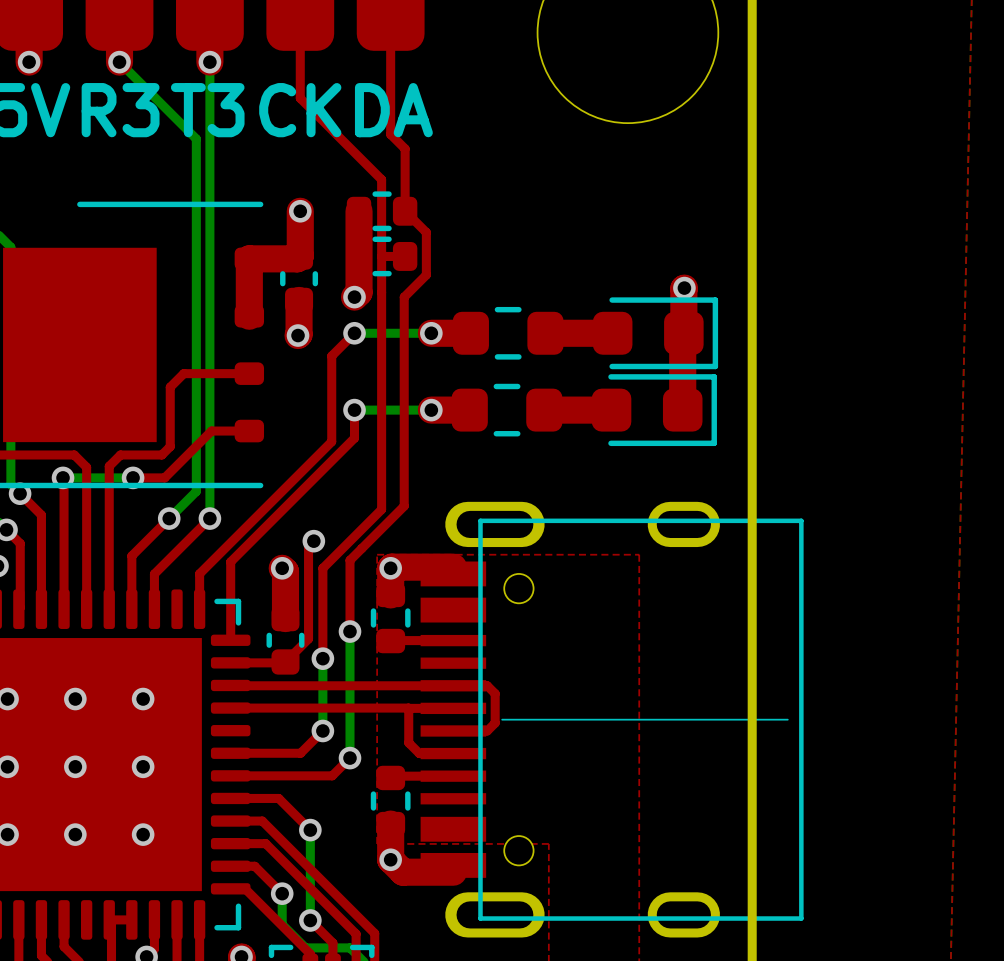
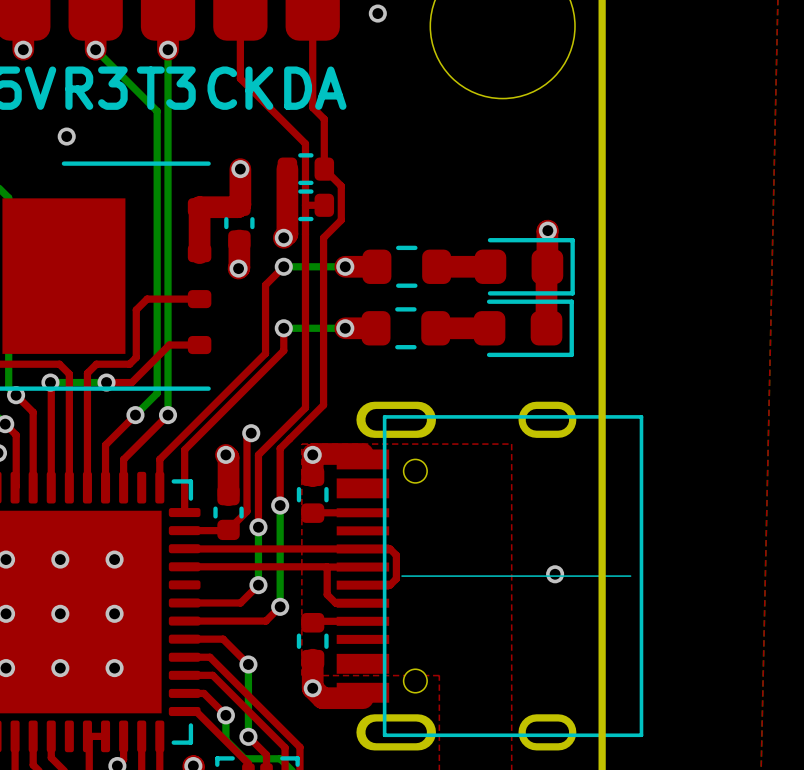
via: none -> (377, 13)
via: none -> (66, 136)
via: none -> (555, 574)

